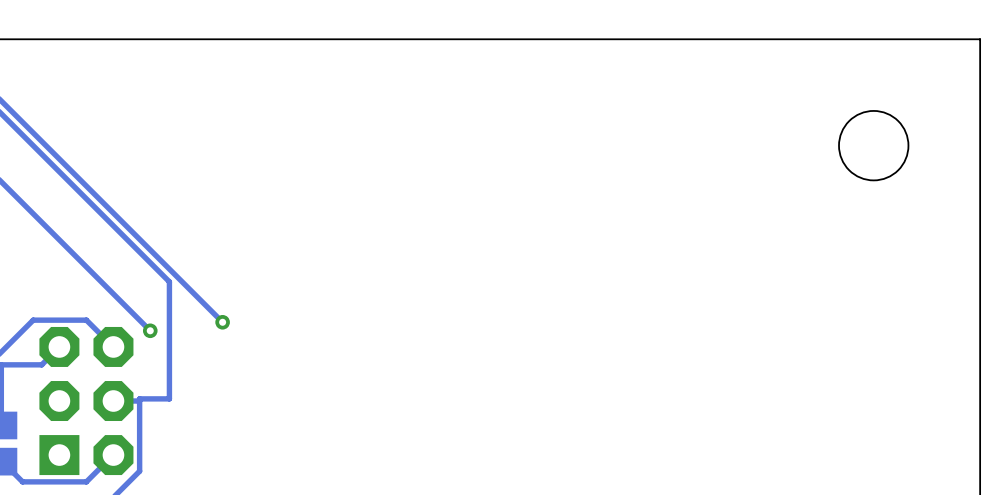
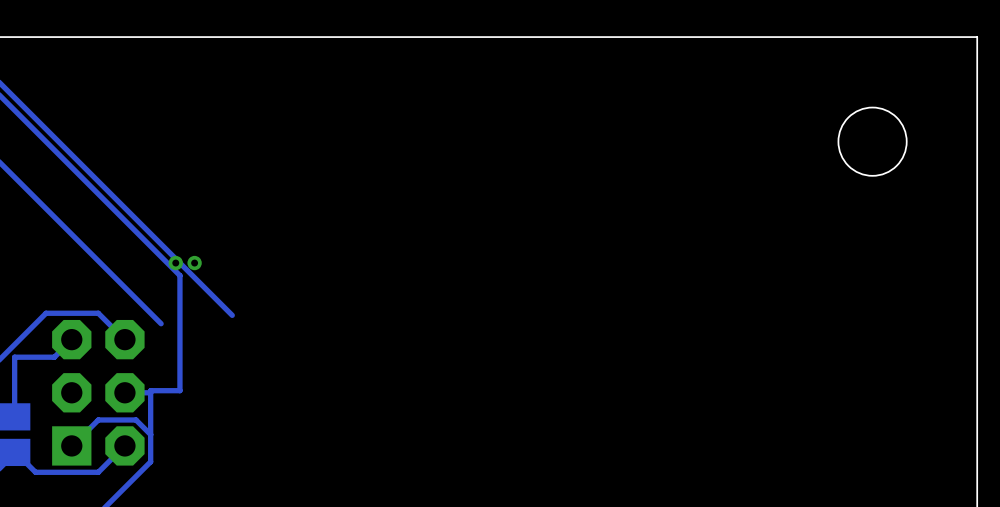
via: none -> (175, 263)
via: none -> (194, 263)
via: (222, 322) -> none
via: (150, 330) -> none
track: none -> (150, 434) (136, 419) (98, 419) (71, 445)

